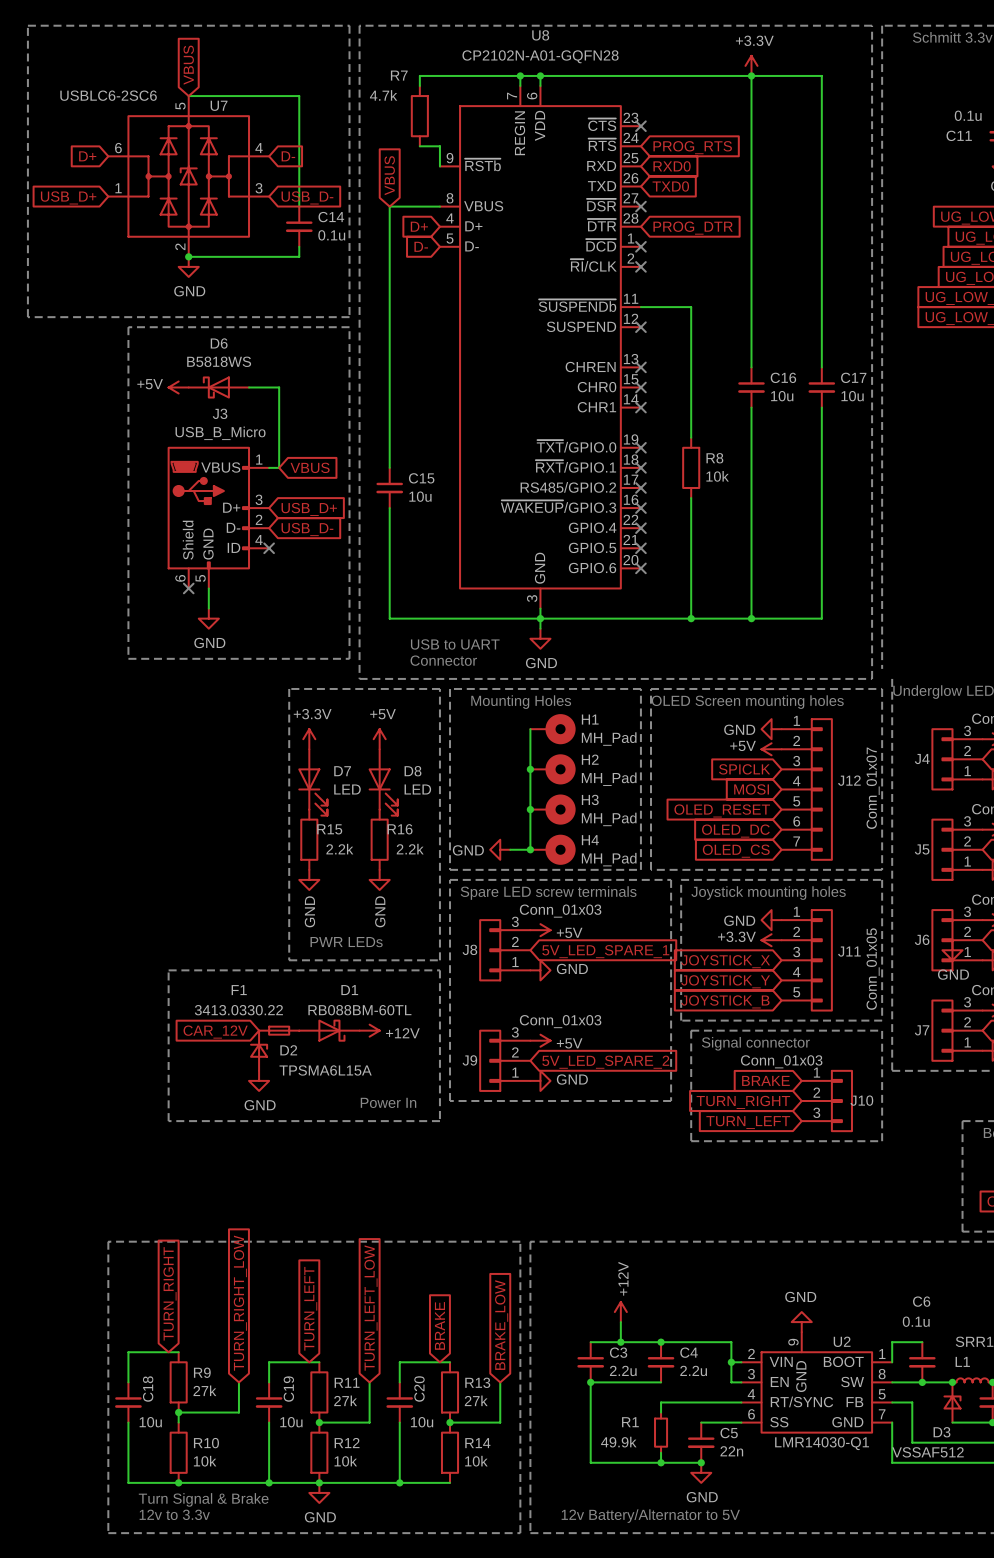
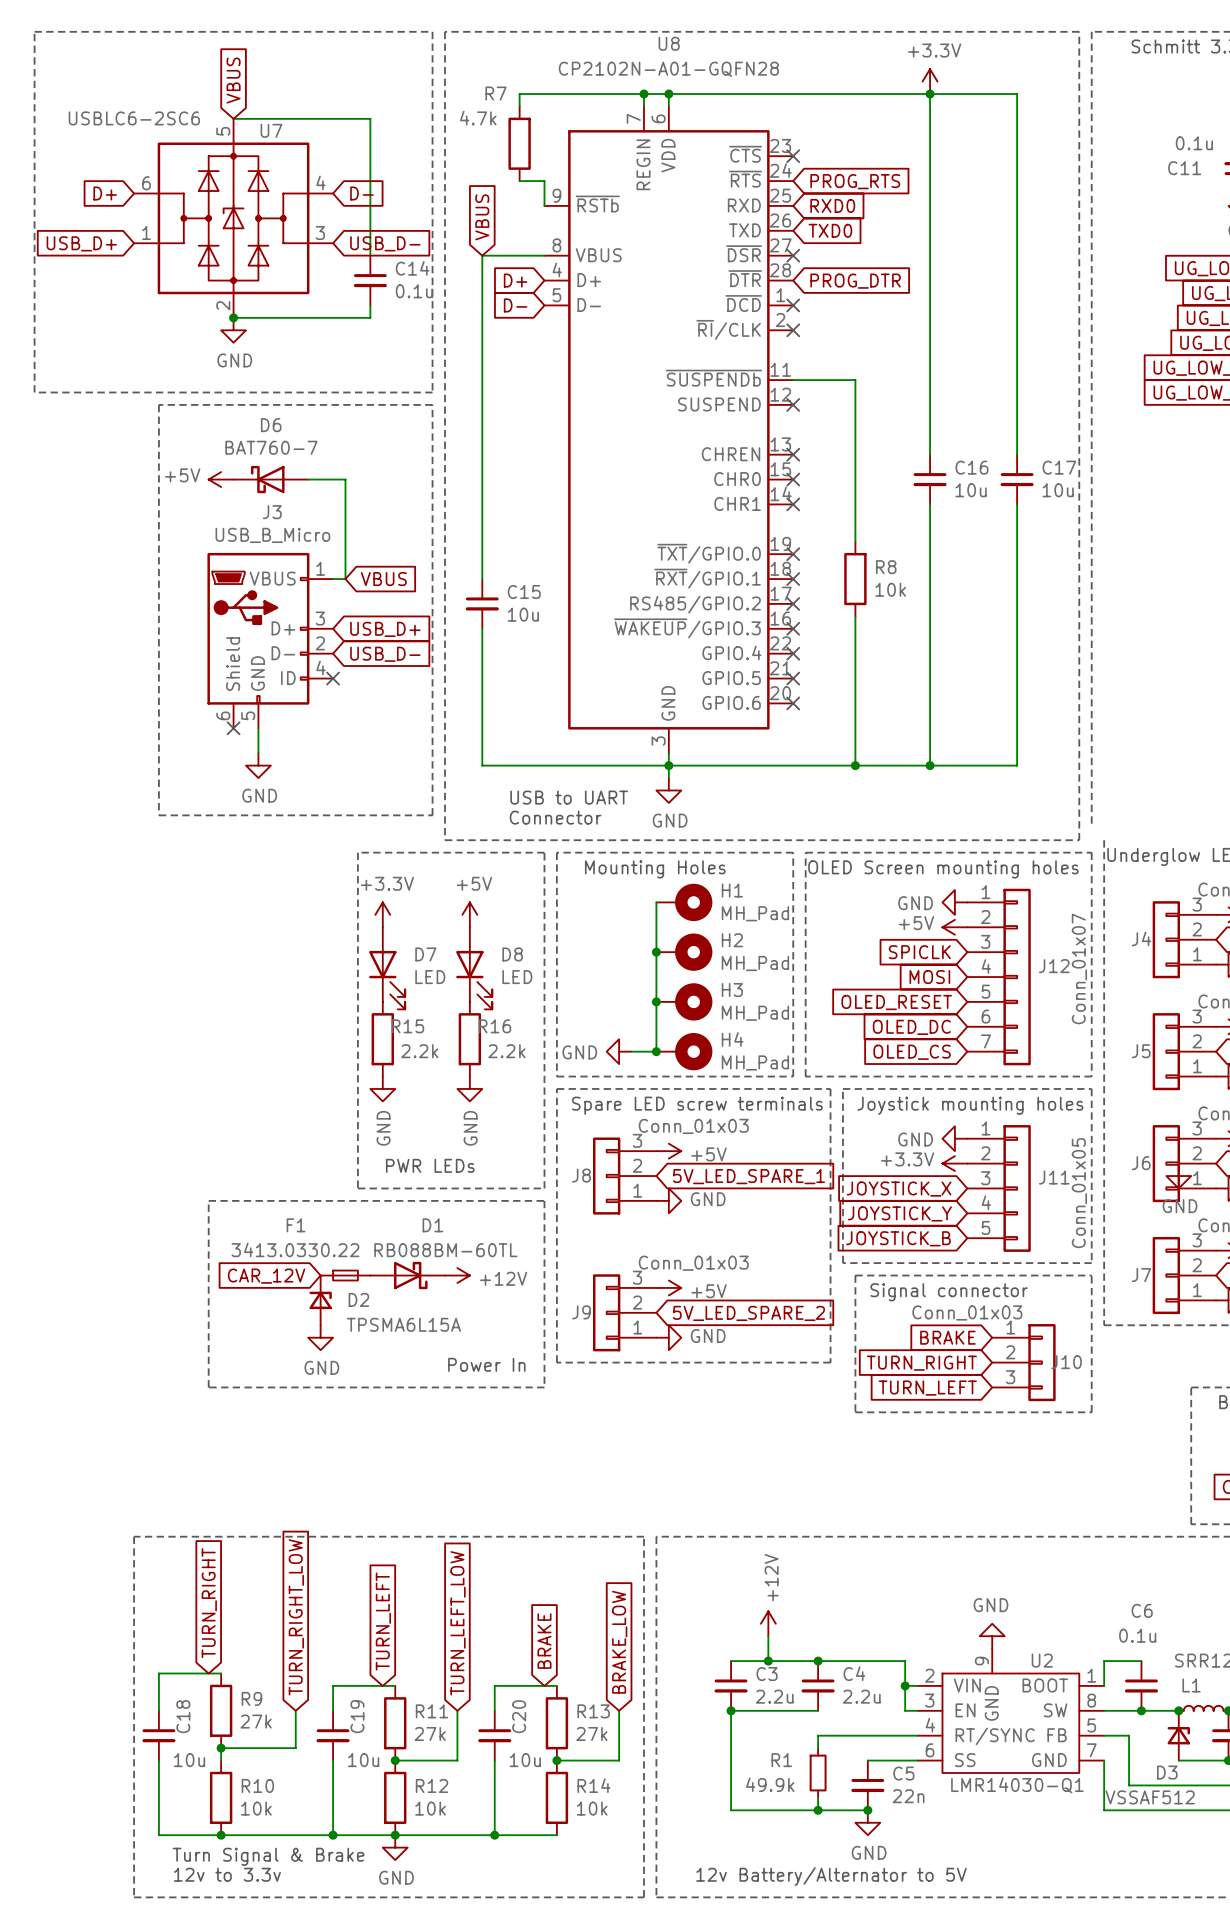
D6 value: B5818WS (219, 361) -> BAT760-7 (271, 447)

